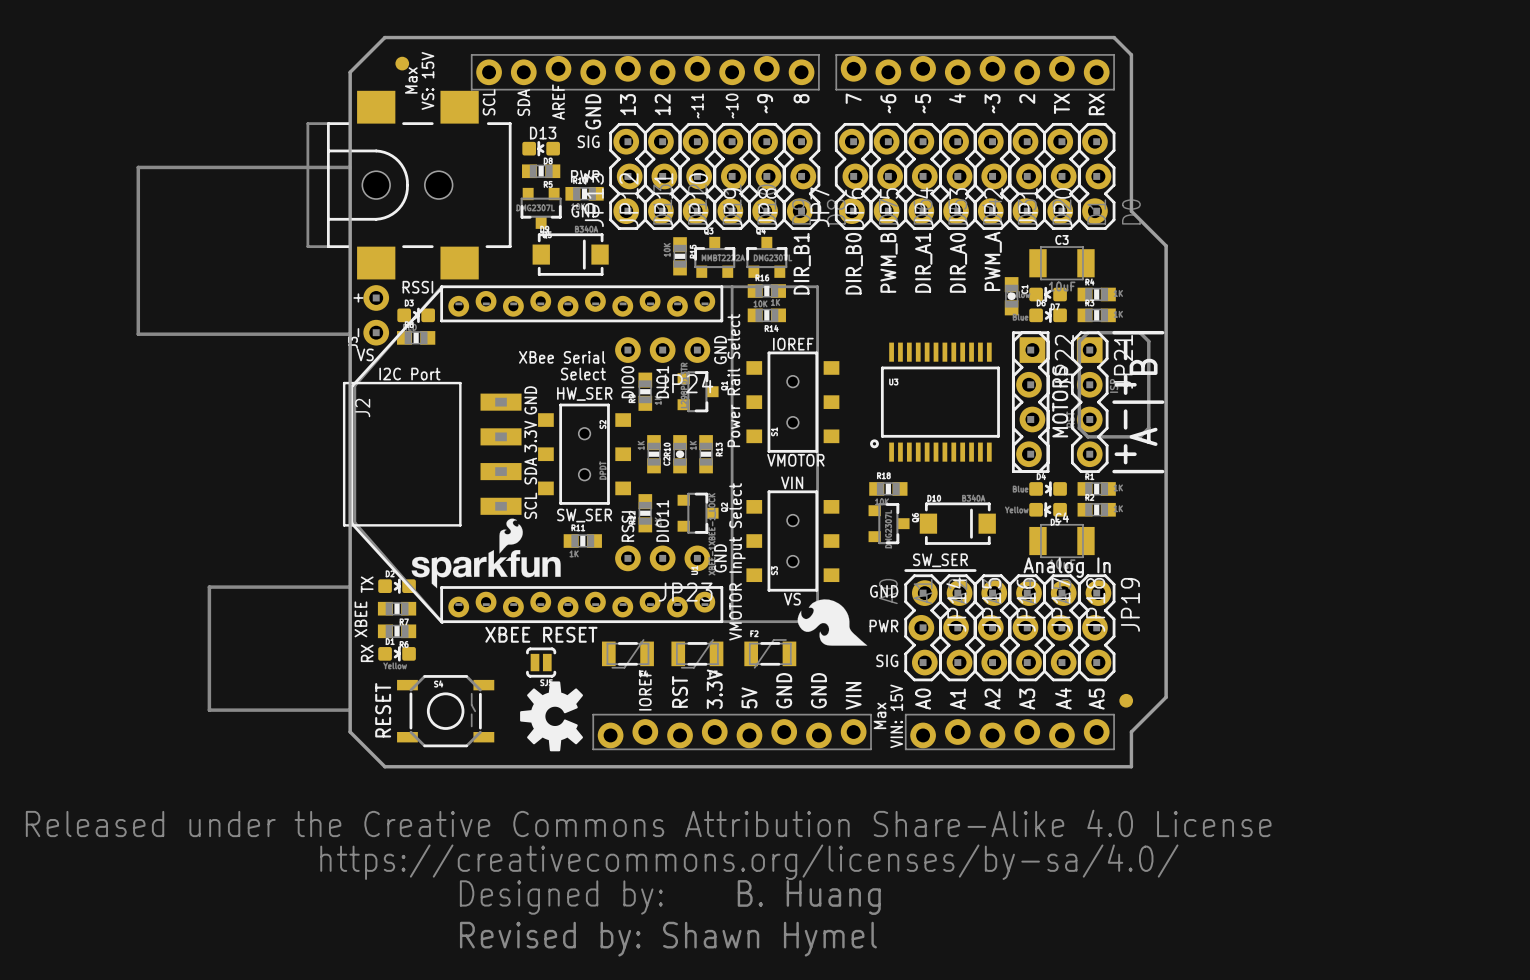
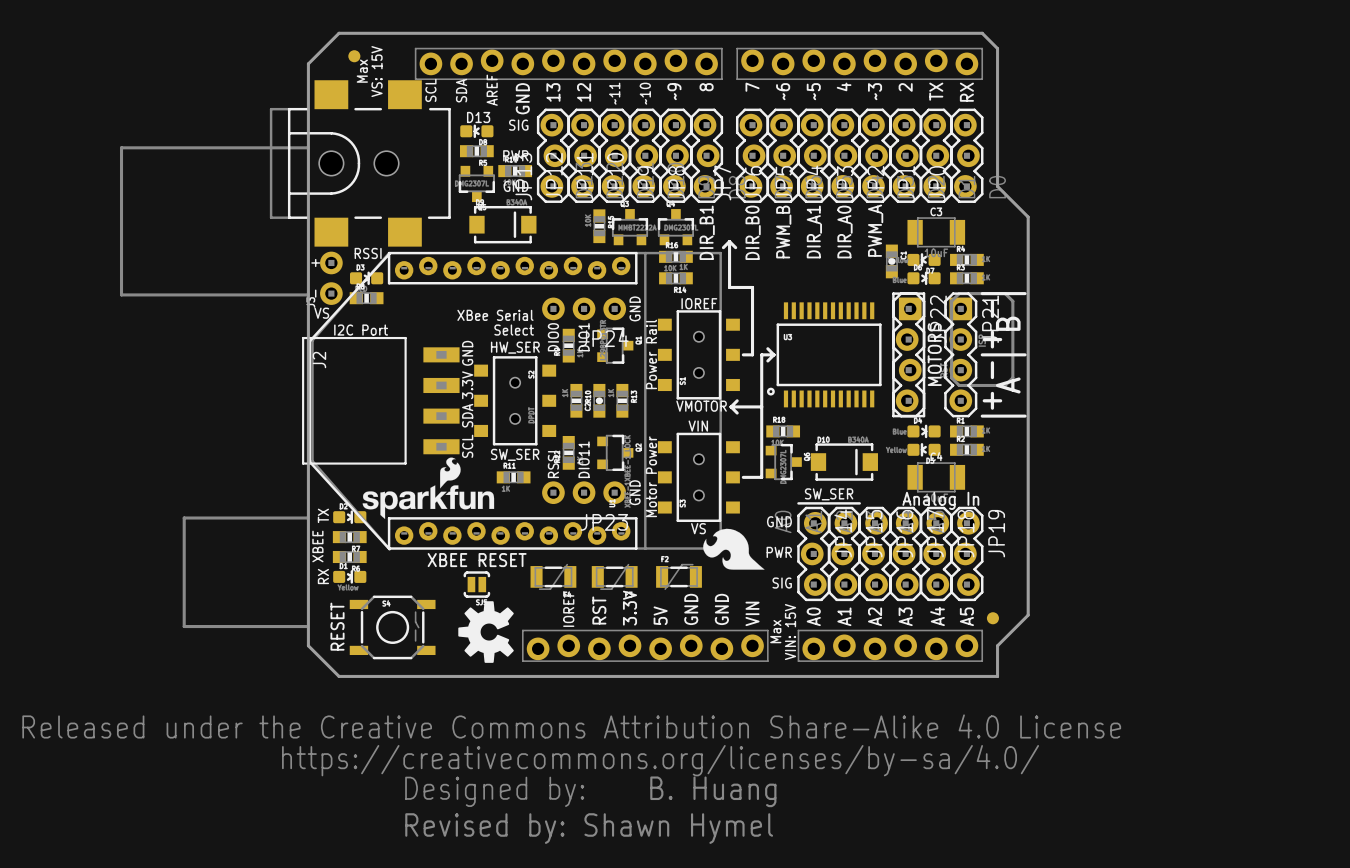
line: none -> (729, 241) (729, 287) (752, 287) (752, 354) (743, 354)
line: none -> (729, 241) (723, 247)
line: none -> (729, 241) (735, 247)
text: Power Rail Select (733, 380) -> Power Rail (651, 354)
line: none -> (767, 348) (773, 354)
line: none -> (773, 354) (761, 354) (761, 477) (743, 477)
line: none -> (773, 354) (767, 360)
line: none -> (737, 400) (731, 406)
line: none -> (731, 406) (761, 406)
line: none -> (731, 406) (737, 413)
text: none -> Motor Power (651, 476)
text: VMOTOR Input Select (737, 561) -> none

